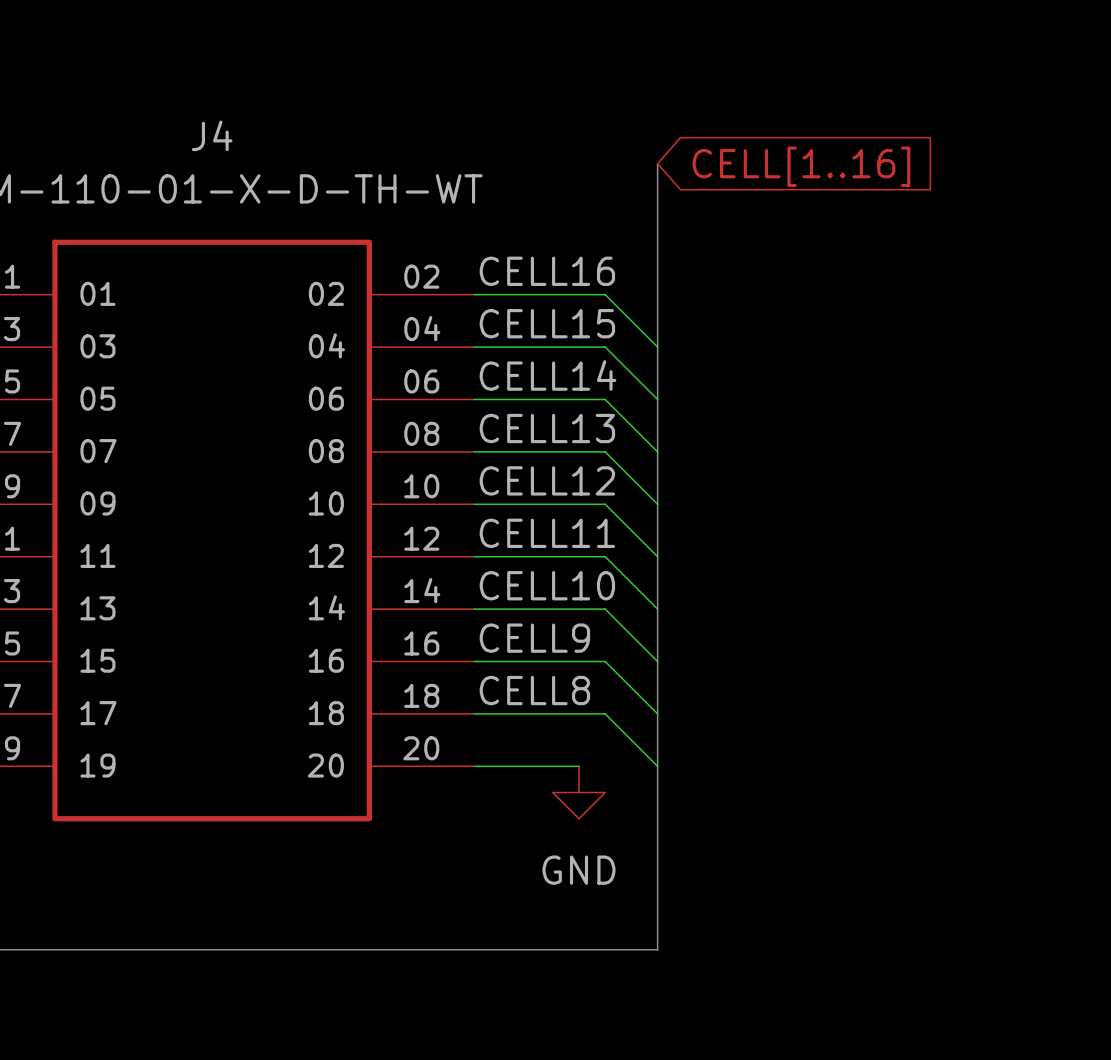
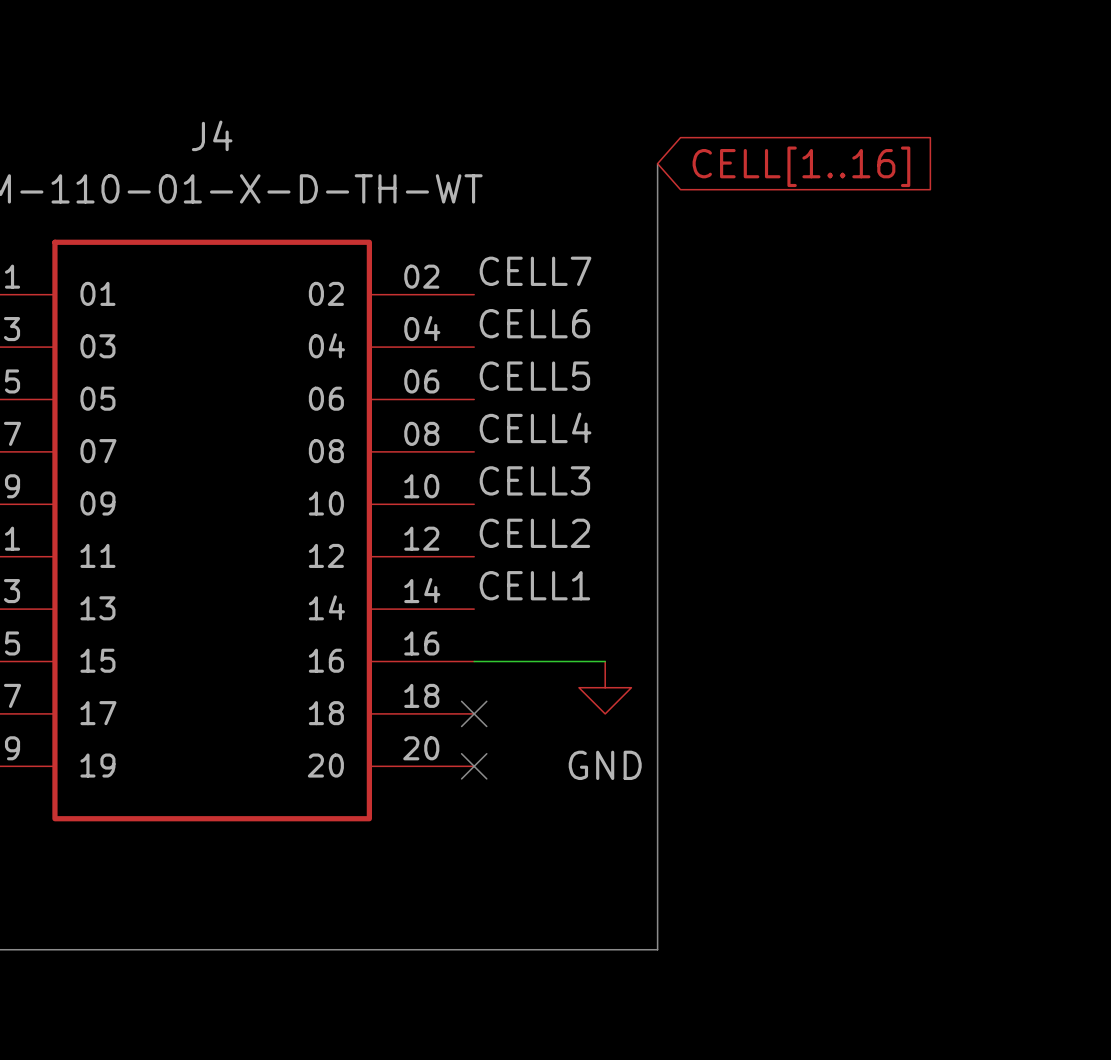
label: CELL16 (547, 271) -> CELL7 (535, 271)
wire: (474, 294) (605, 294) (657, 347) -> none
label: CELL15 (547, 323) -> CELL6 (534, 323)
wire: (474, 347) (605, 347) (657, 399) -> none
label: CELL14 (548, 375) -> CELL5 (534, 376)
wire: (474, 399) (605, 399) (657, 451) -> none
label: CELL13 (547, 428) -> CELL4 (535, 427)
wire: (474, 451) (605, 451) (657, 504) -> none
label: CELL12 (547, 480) -> CELL3 (534, 480)
wire: (474, 504) (605, 504) (657, 556) -> none
label: CELL11 (547, 533) -> CELL2 (534, 533)
wire: (474, 556) (605, 556) (657, 609) -> none
label: CELL10 (547, 585) -> CELL1 (534, 585)
wire: (474, 609) (605, 609) (657, 661) -> none
label: CELL9 (534, 638) -> none
wire: (605, 661) (657, 713) -> none
label: CELL8 (534, 690) -> none
wire: (474, 713) (605, 713) (657, 766) -> none
no-connect mark: none -> (474, 713)
wire: (474, 766) (579, 766) -> none
no-connect mark: none -> (474, 766)
power symbol position: GND (579, 792) -> GND (605, 687)

